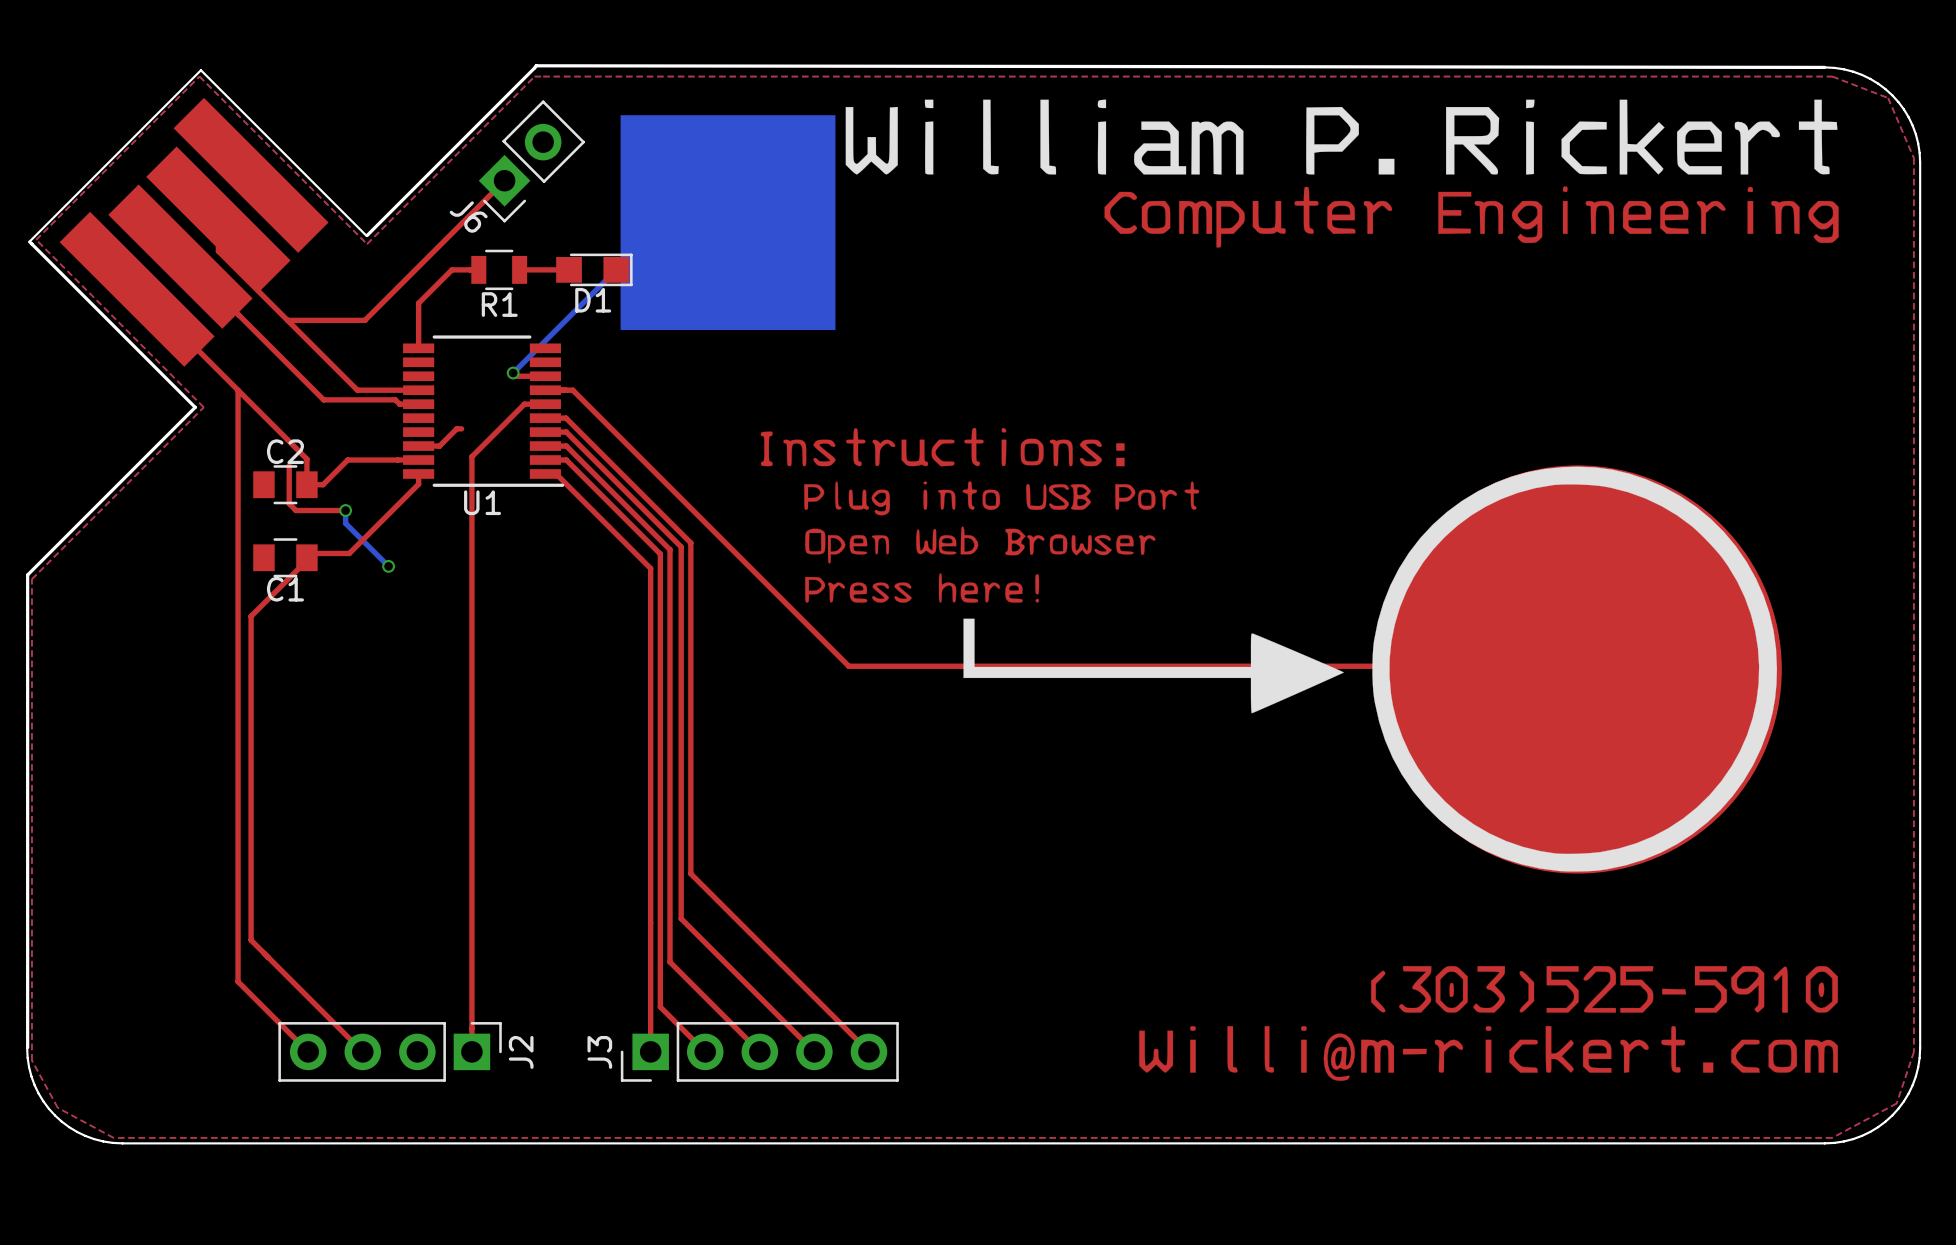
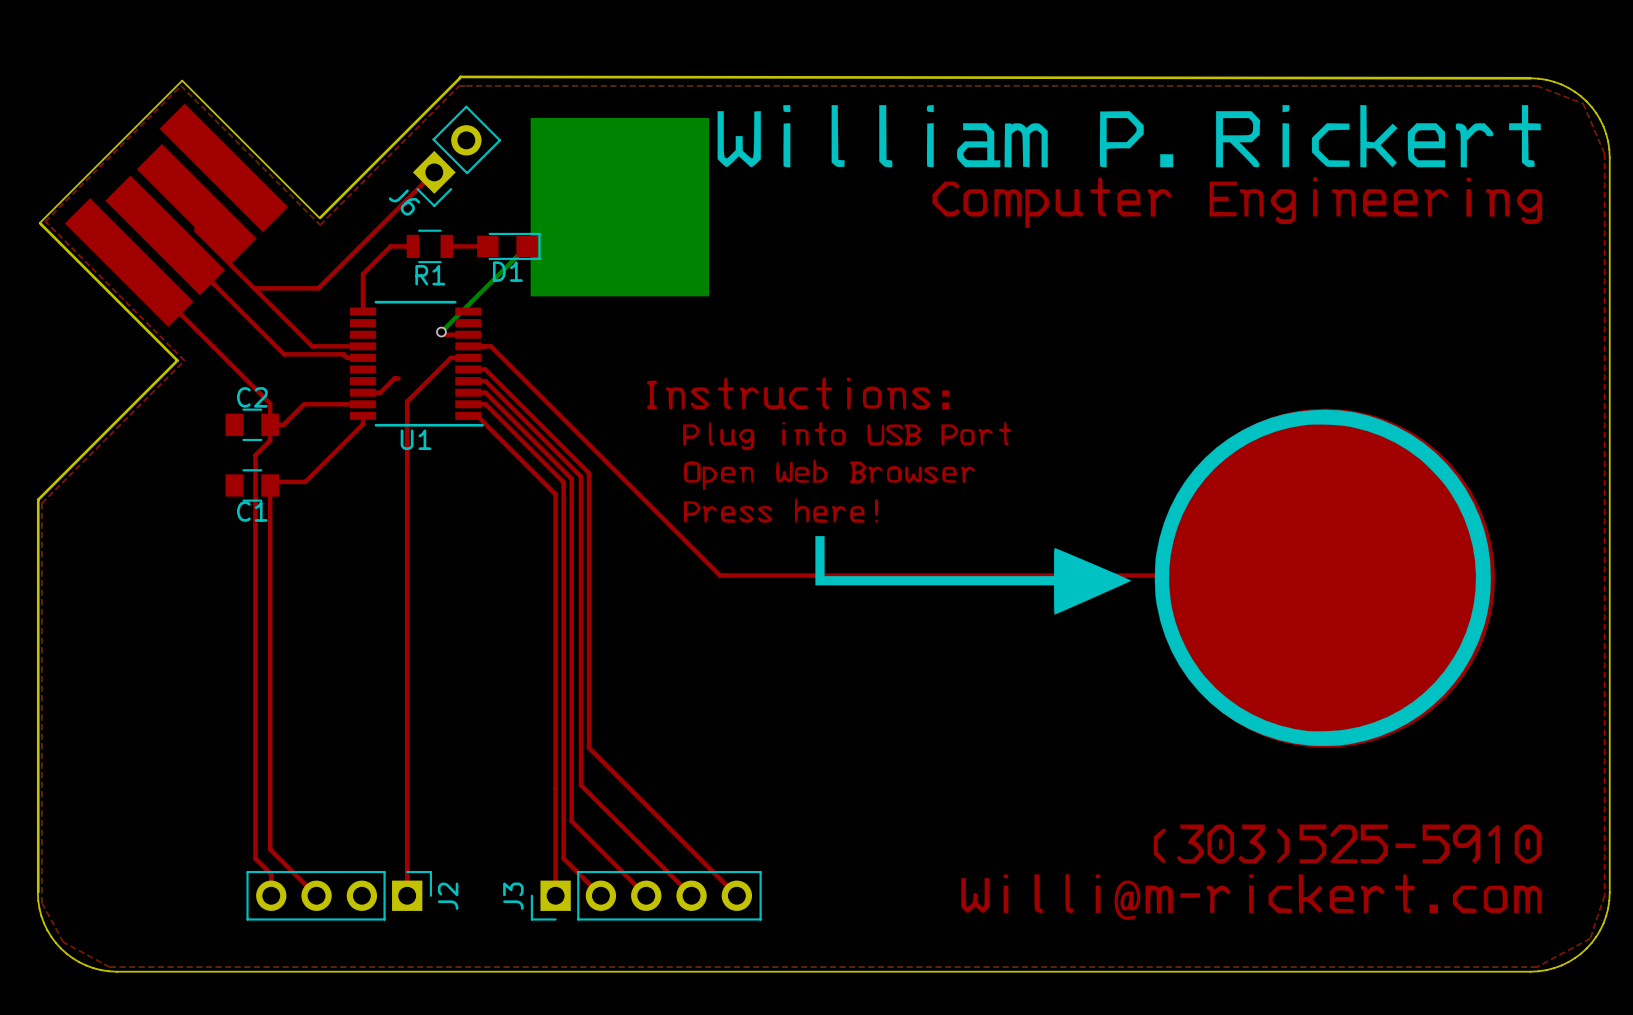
top track: (238, 390) (238, 981) (308, 1051) -> (270, 424) (270, 440) (255, 455) (255, 858) (271, 874) (271, 895)
top track: (289, 465) (289, 503) (295, 510) (345, 510) -> none
bottom track: (345, 510) (345, 523) (388, 566) -> none
via: (345, 510) -> none
top track: (306, 560) (251, 616) (251, 940) (306, 996) -> (270, 487) (270, 849)
via: (388, 566) -> none

